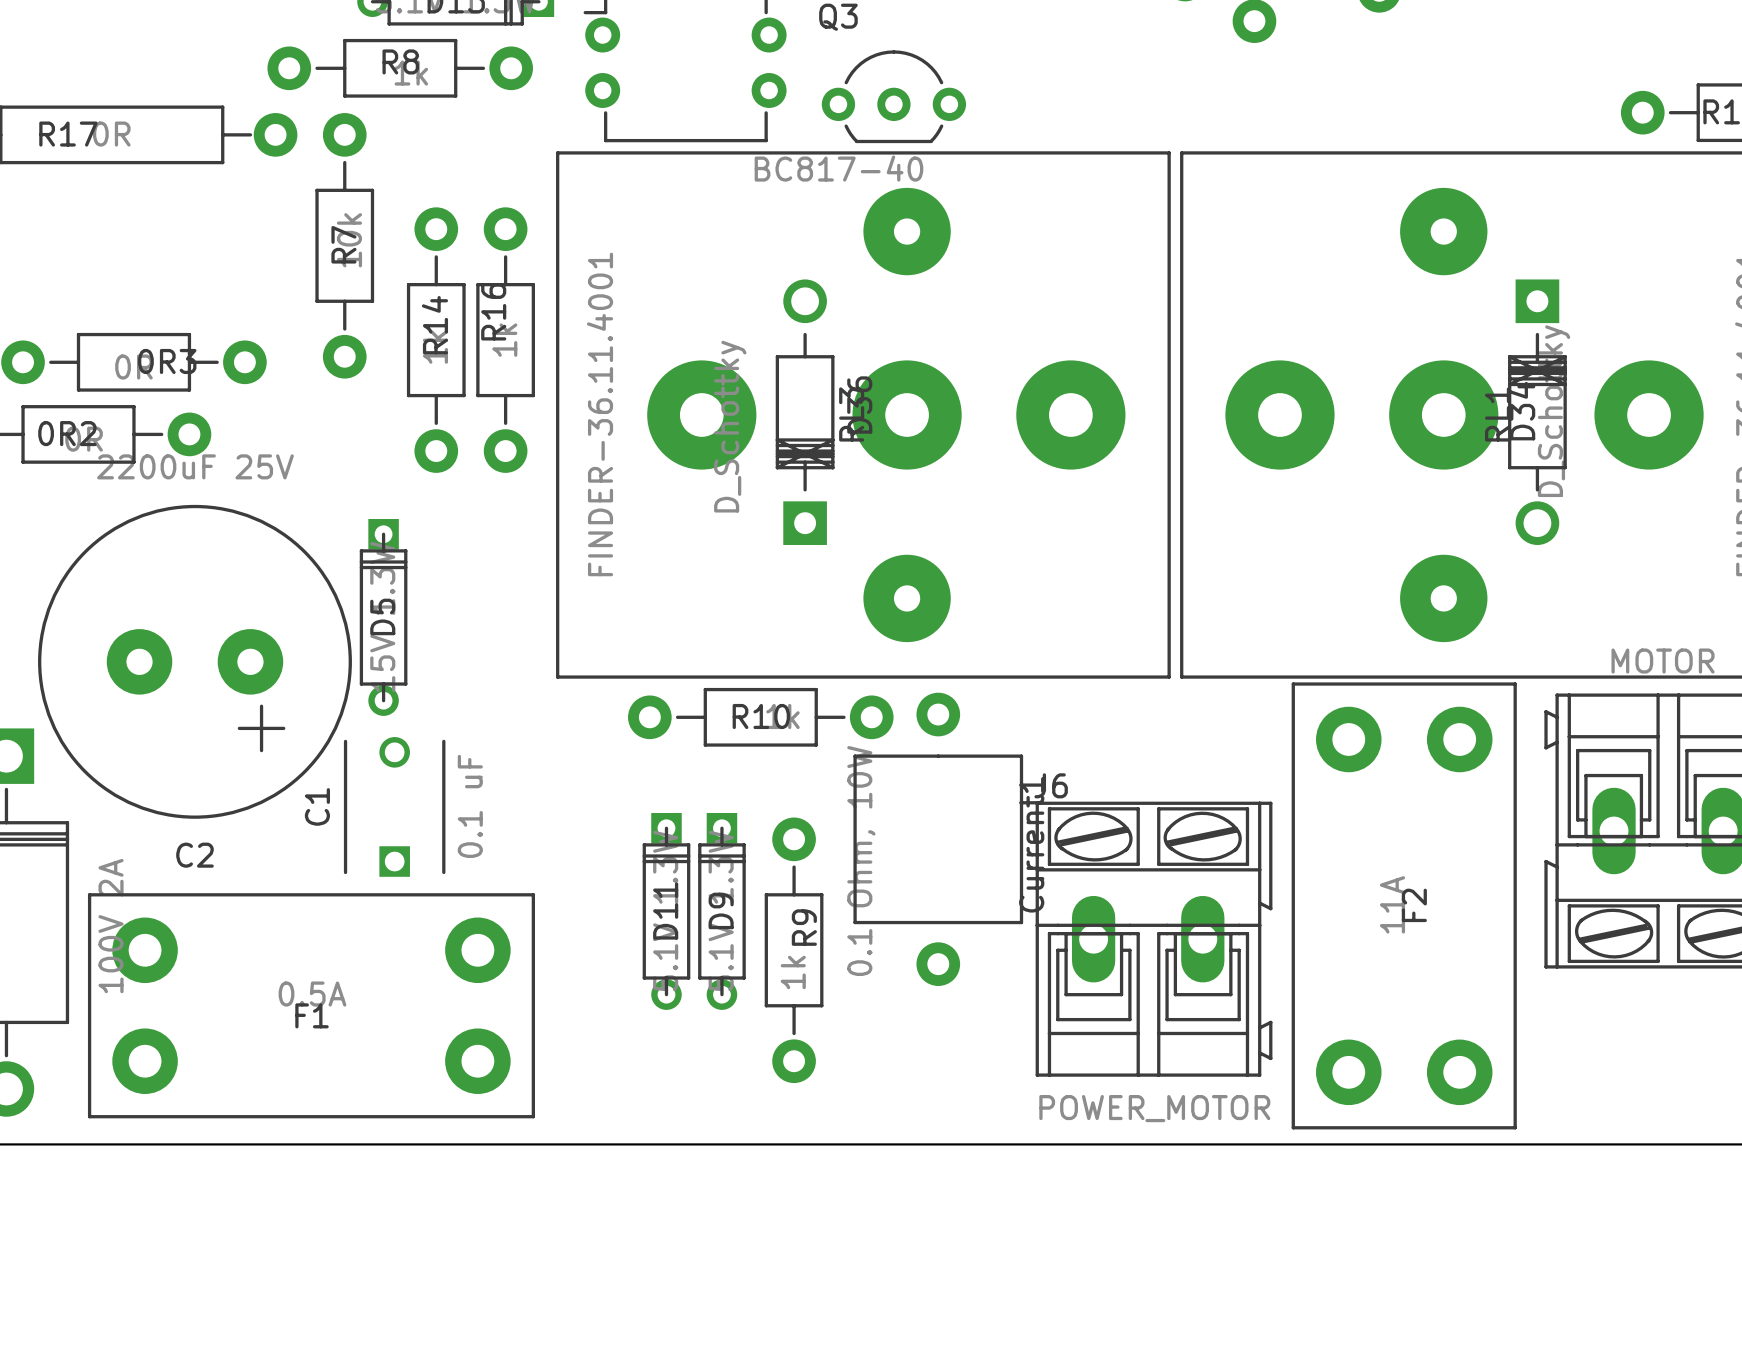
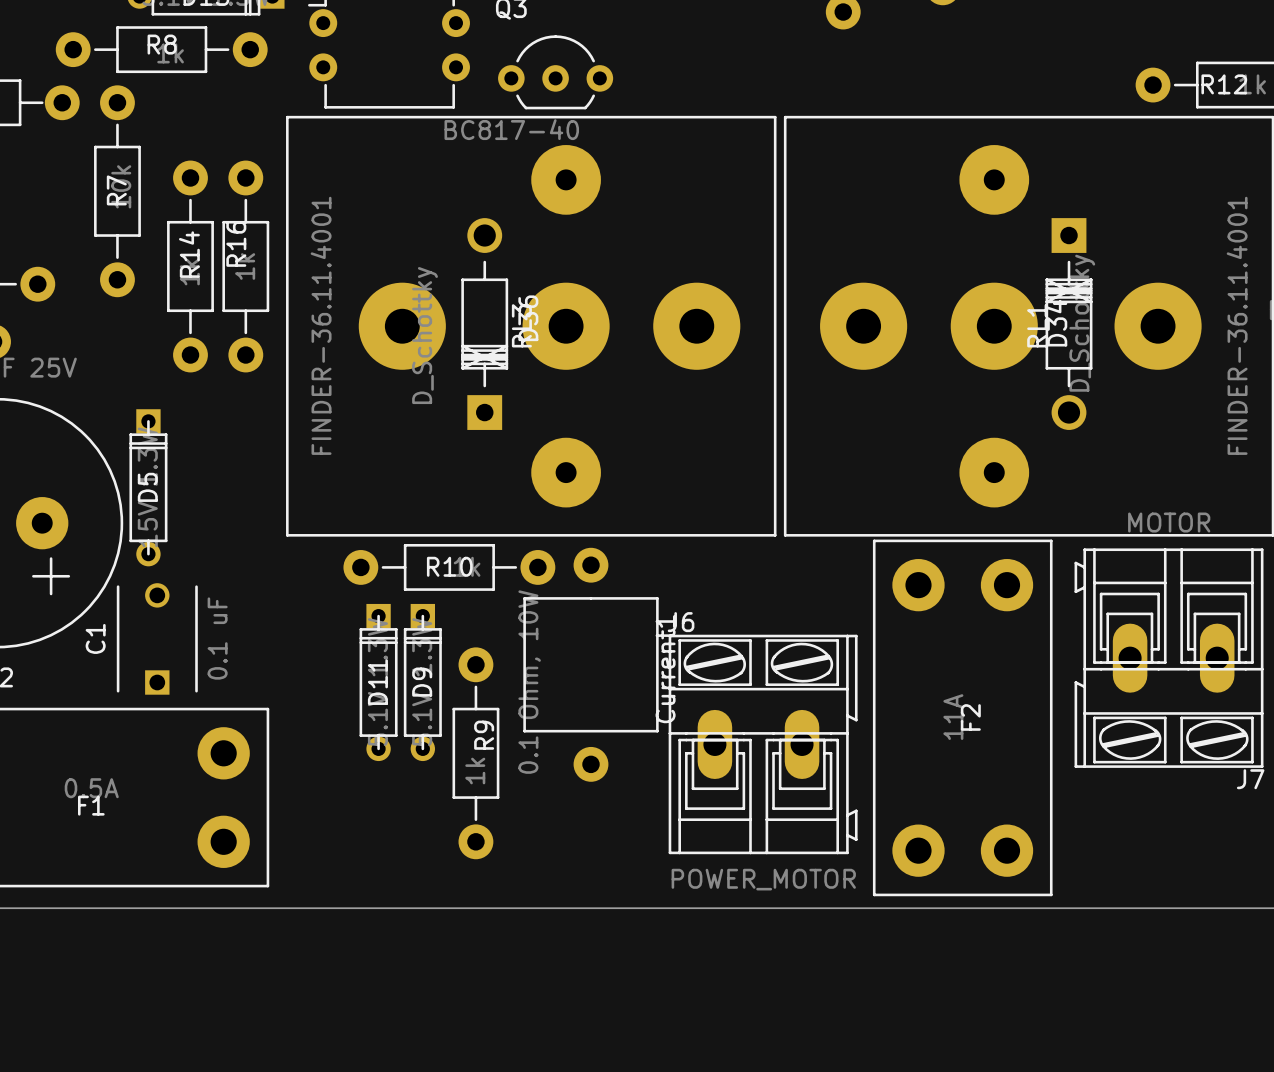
D11 position: (666, 911) -> (378, 682)
D9 position: (721, 911) -> (422, 682)

